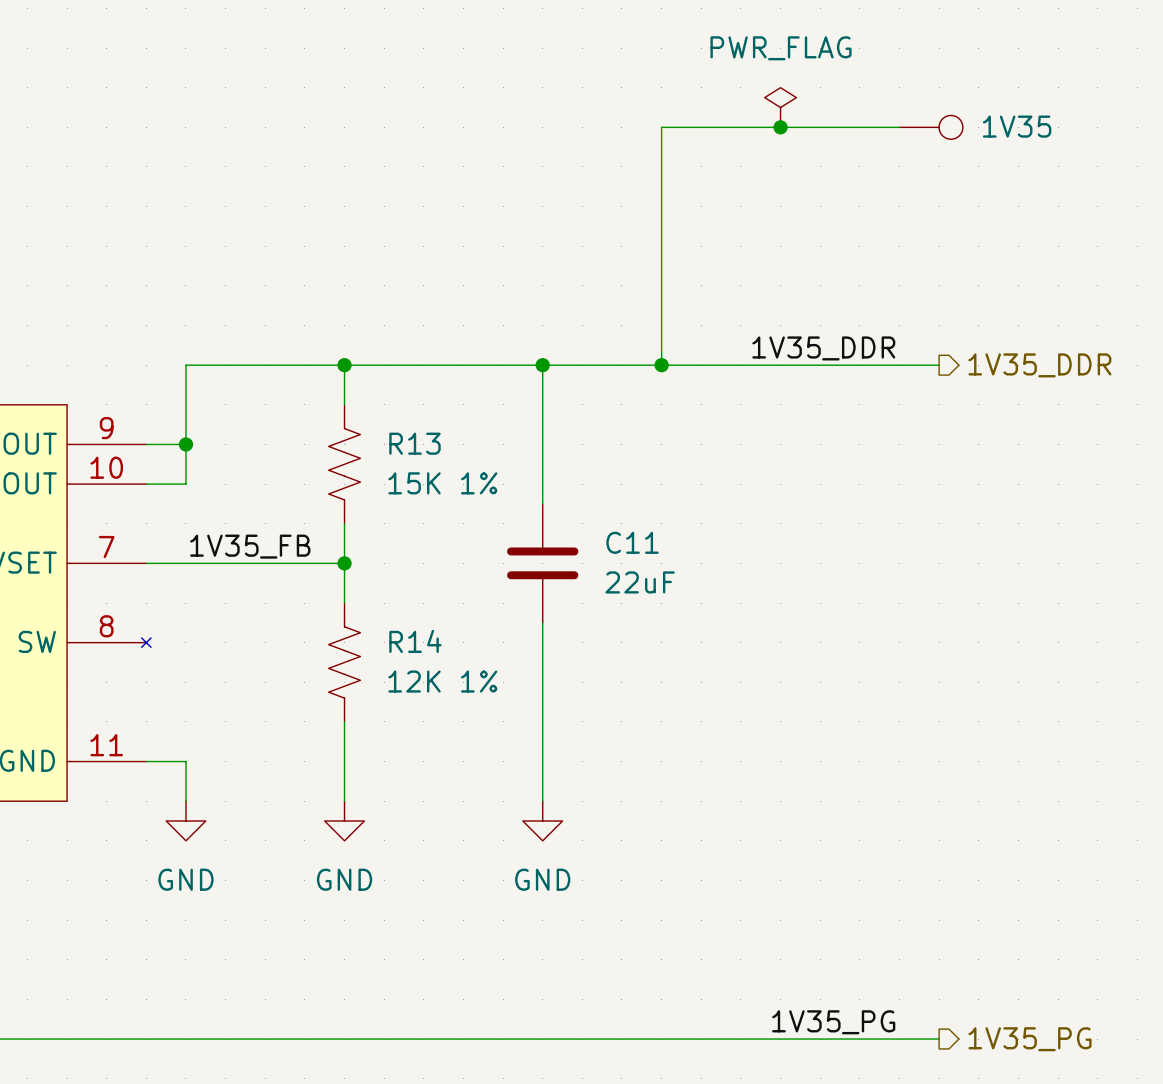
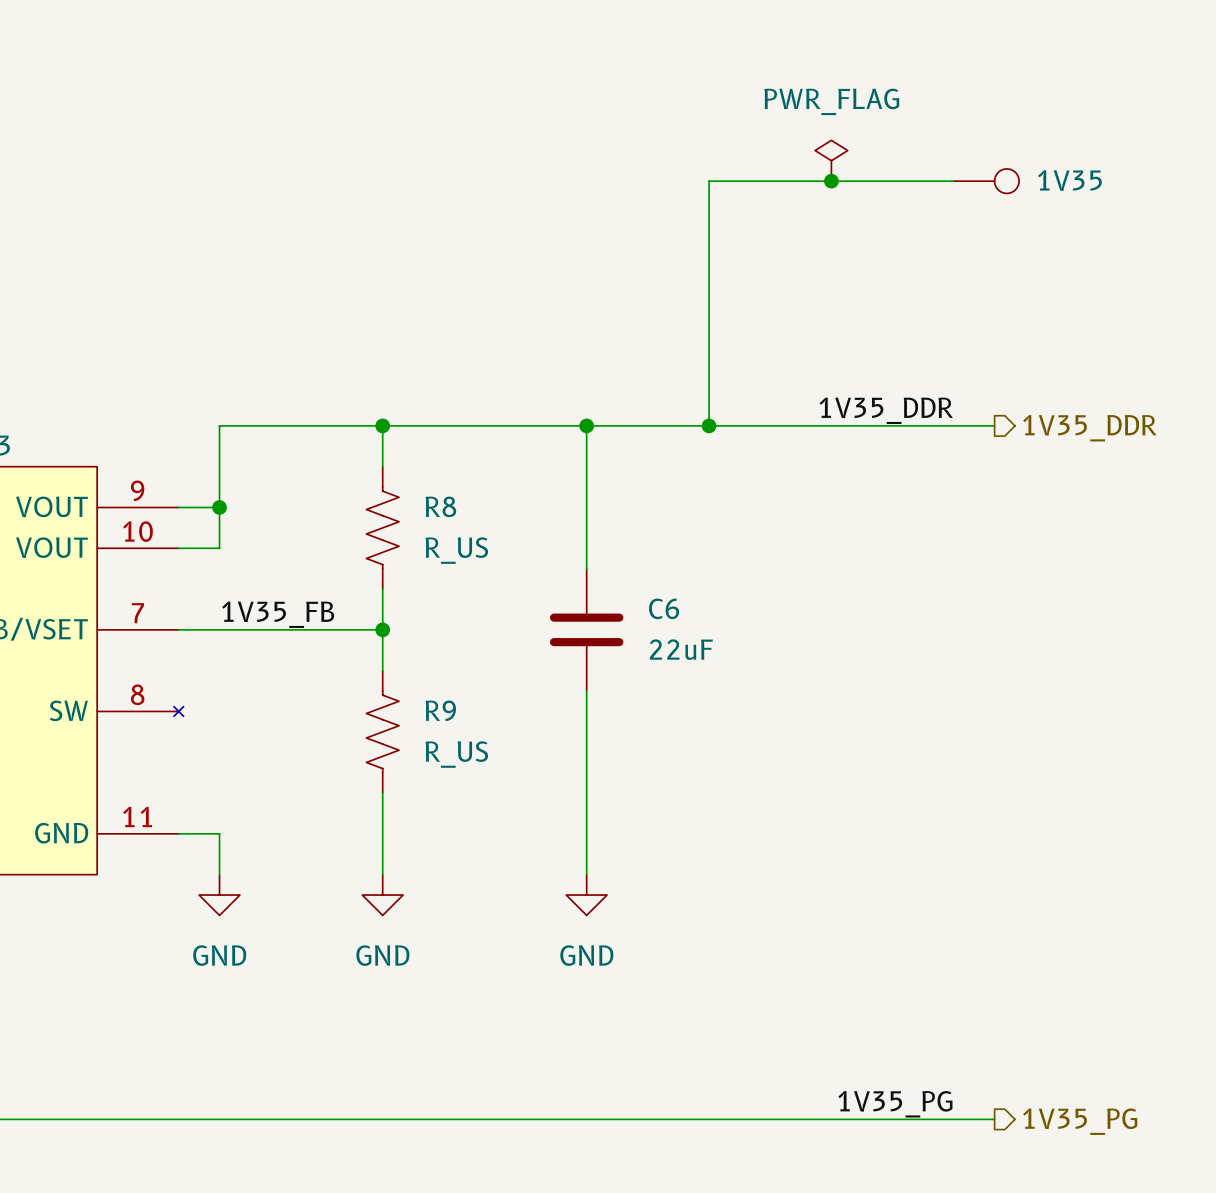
R13 name: R13 (414, 443) -> R8 (440, 506)
R13 value: 15K 1% (442, 483) -> R_US (456, 550)
C11 name: C11 (632, 542) -> C6 (664, 608)
R14 name: R14 (415, 641) -> R9 (440, 710)
R14 value: 12K 1% (442, 681) -> R_US (456, 754)

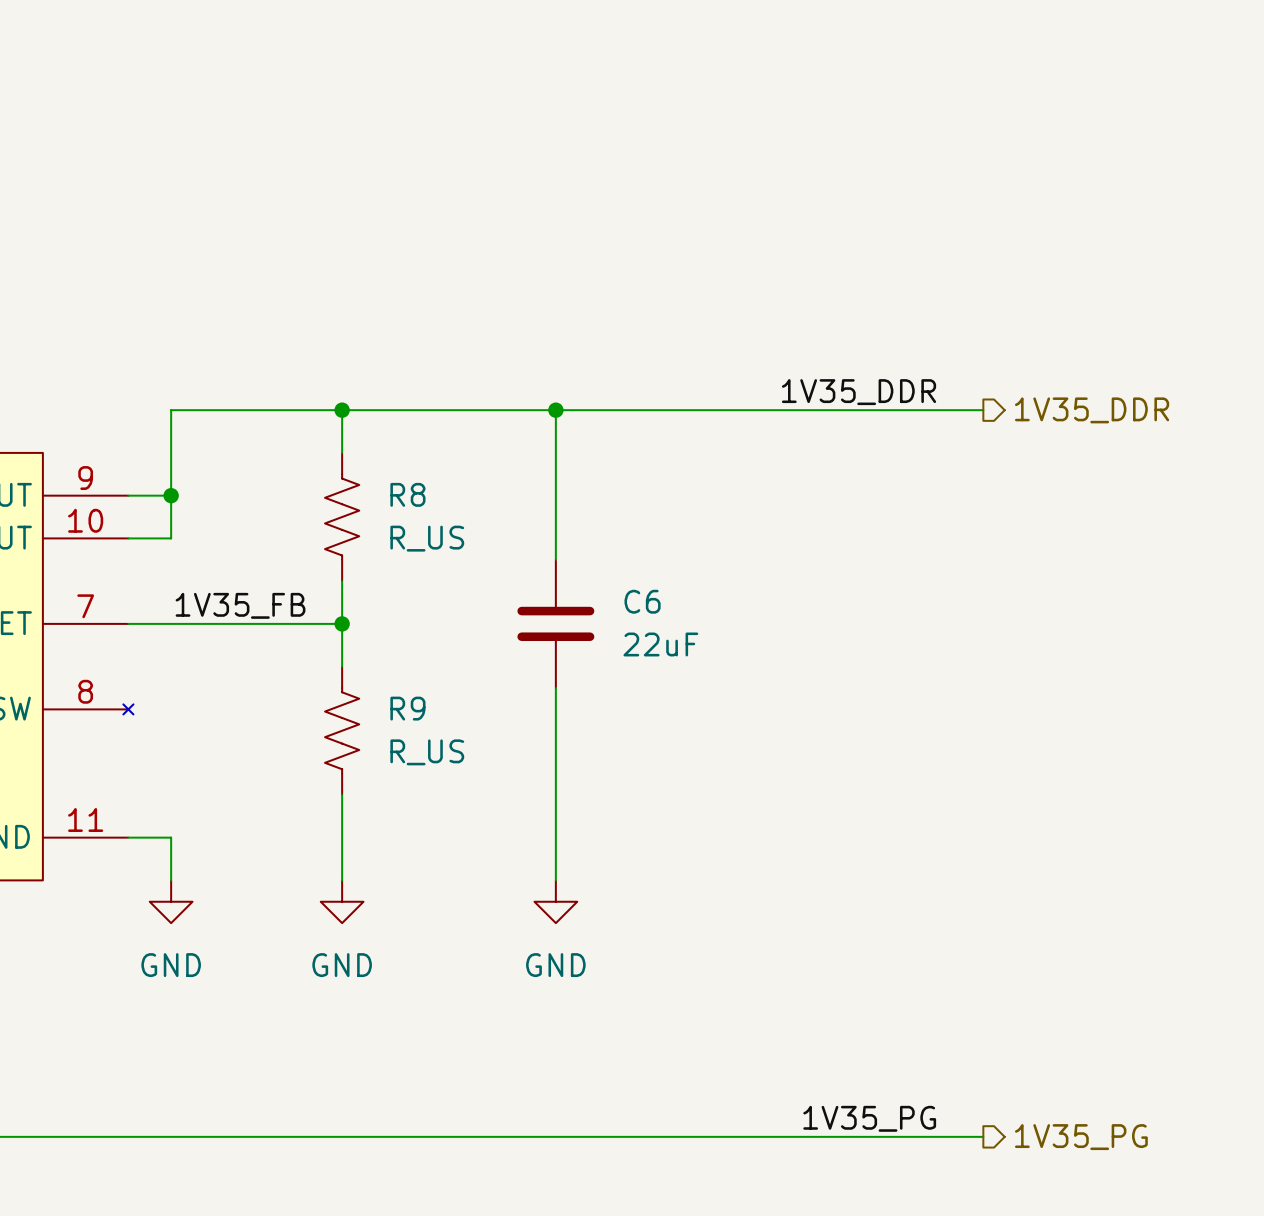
power symbol: PWR_FLAG (831, 160) -> none
junction: (831, 181) -> none
wire: (953, 181) (709, 181) (709, 425) -> none
1V35: (986, 181) -> none
junction: (709, 425) -> none

